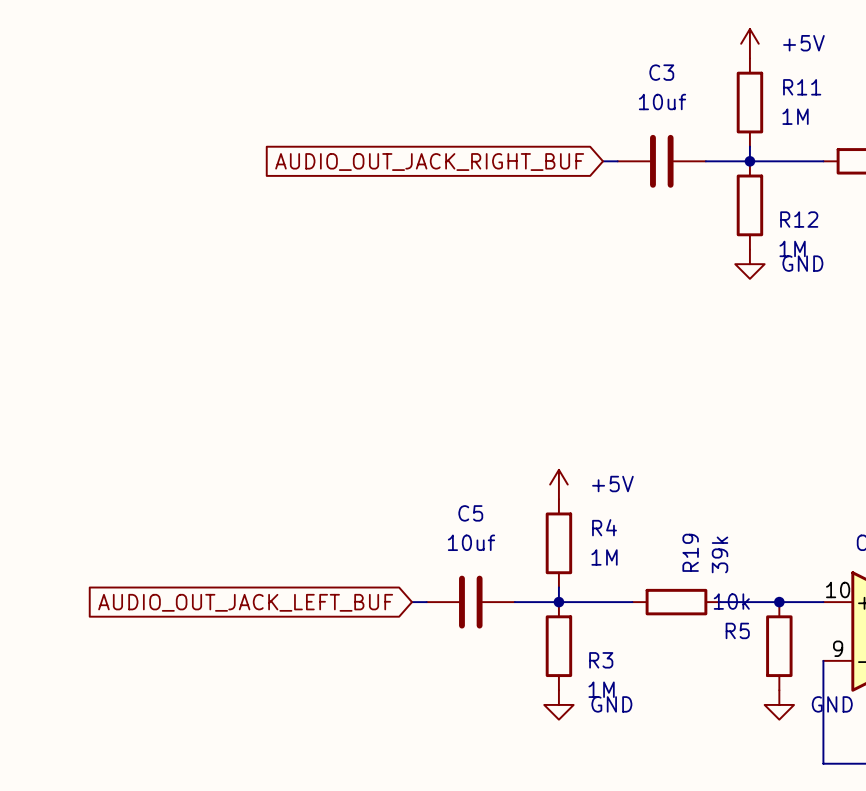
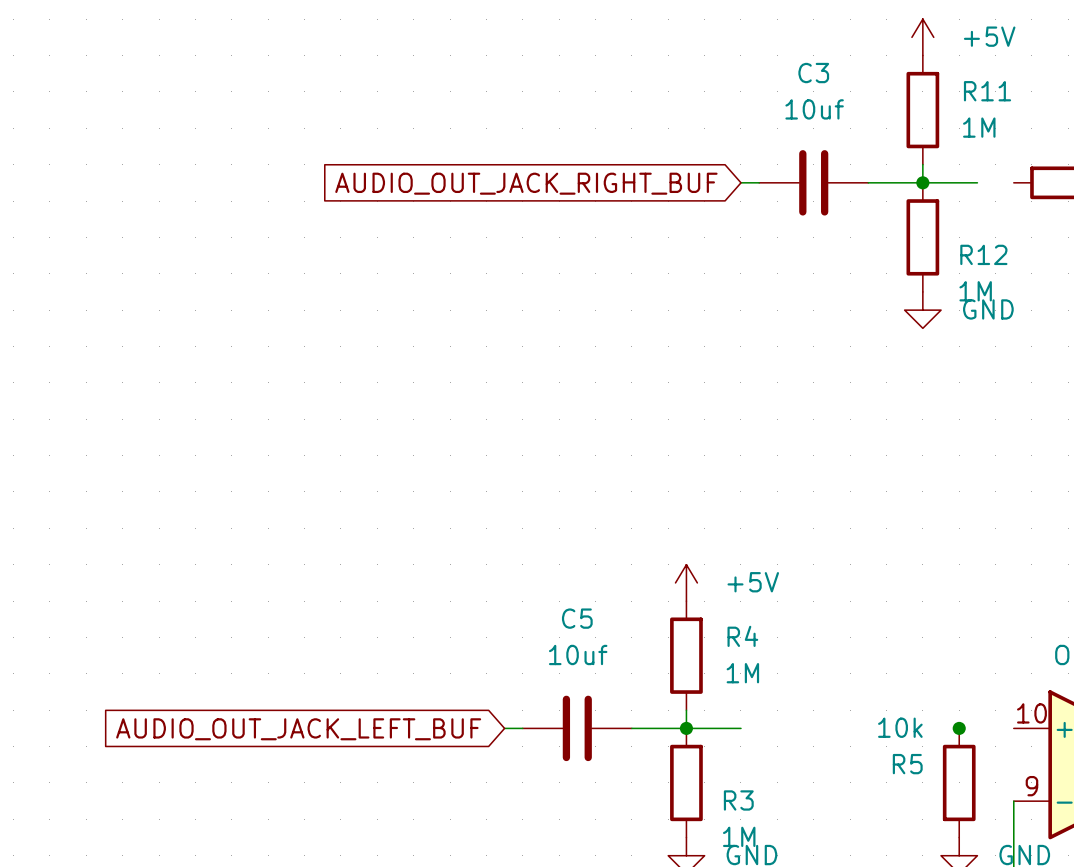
wire: (794, 161) (823, 161) -> none
wire: (603, 602) (632, 602) -> none
R19: 39k (676, 602) -> none
wire: (720, 602) (823, 602) -> none

